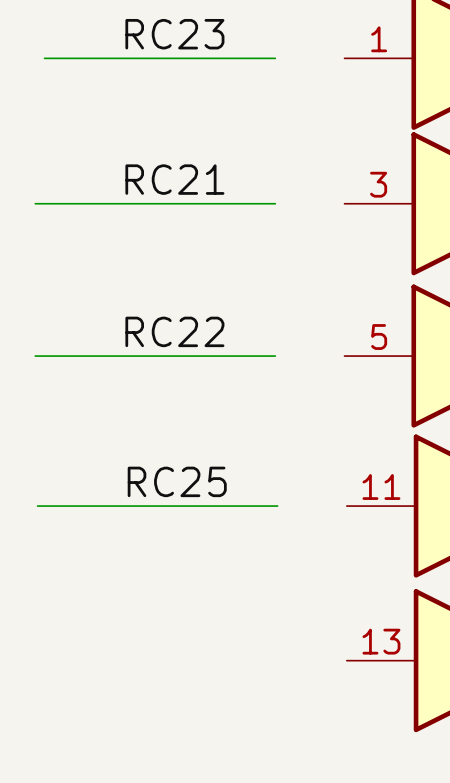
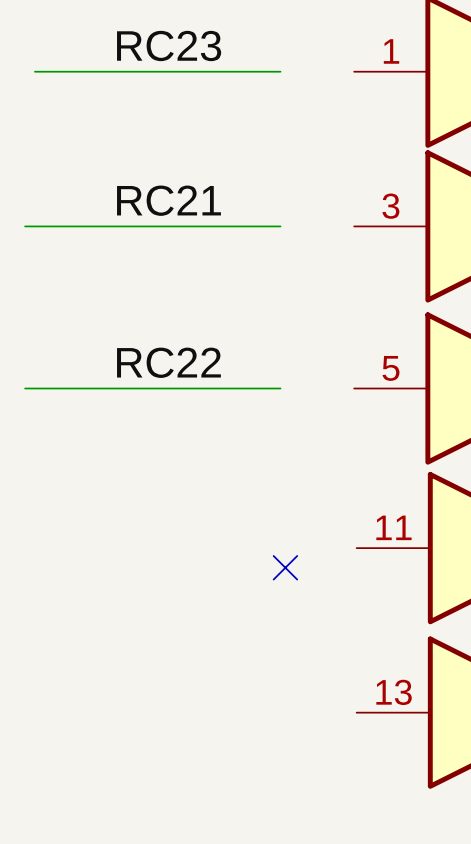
label: RC25 (177, 481) -> none
wire: (37, 506) (277, 506) -> none
no-connect mark: none -> (285, 567)

